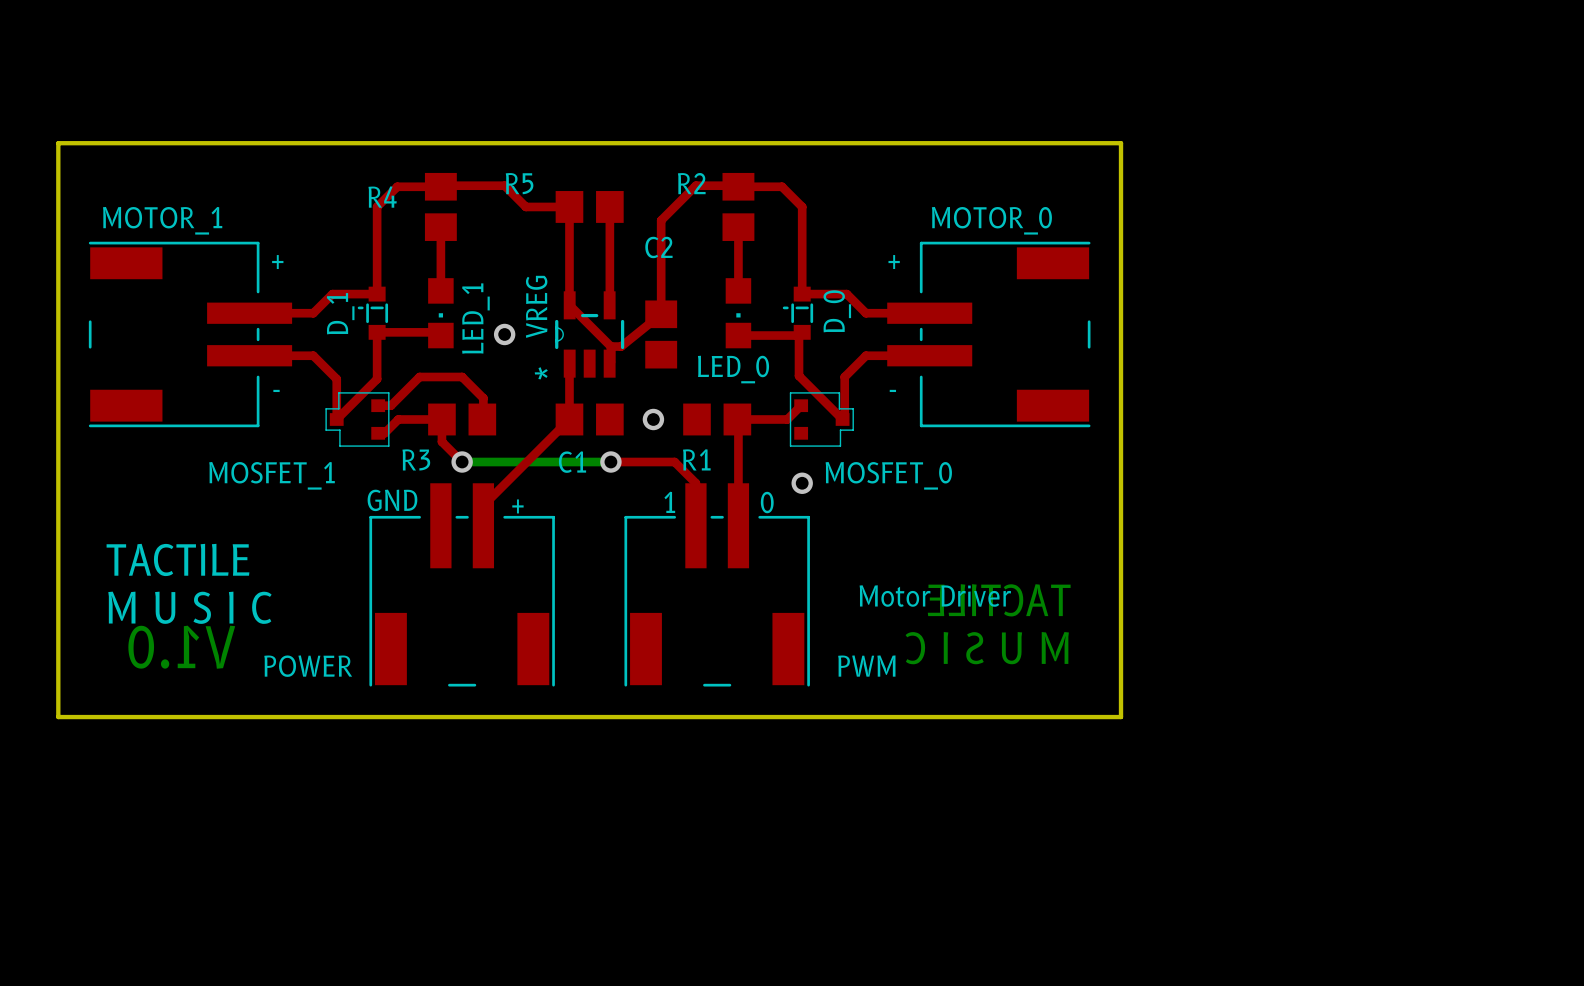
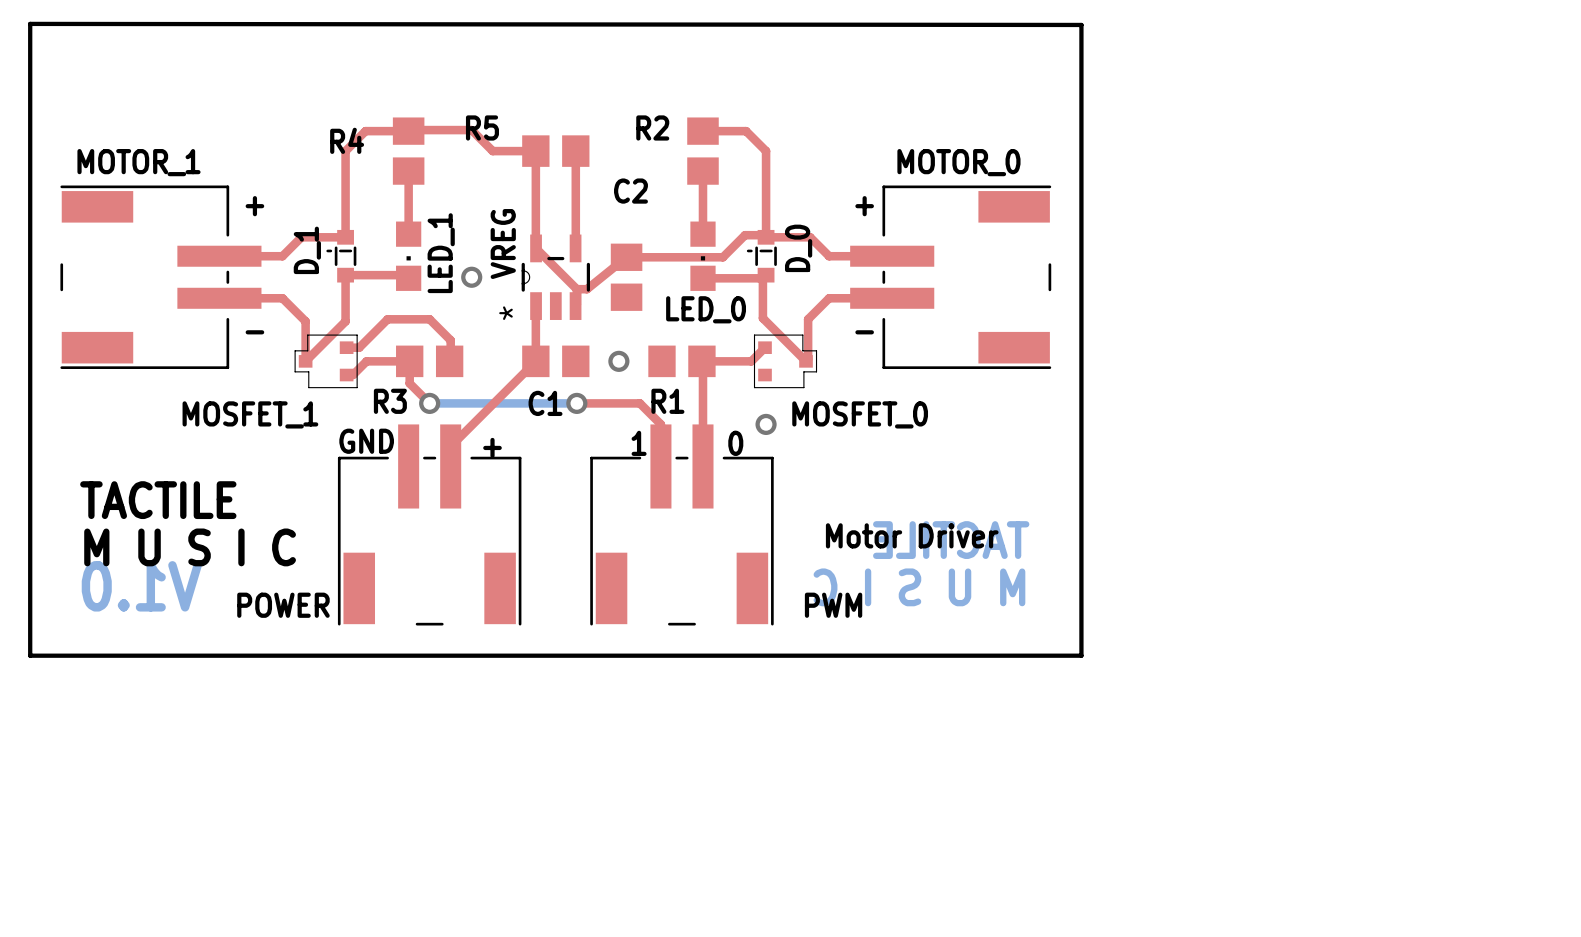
board edge: (58, 143) (1121, 143) -> (30, 88) (30, 23) (1081, 24) (1081, 88)
top track: (738, 186) (695, 185) (661, 220) (661, 314) -> (766, 237) (763, 235) (745, 235) (722, 257) (626, 257)

